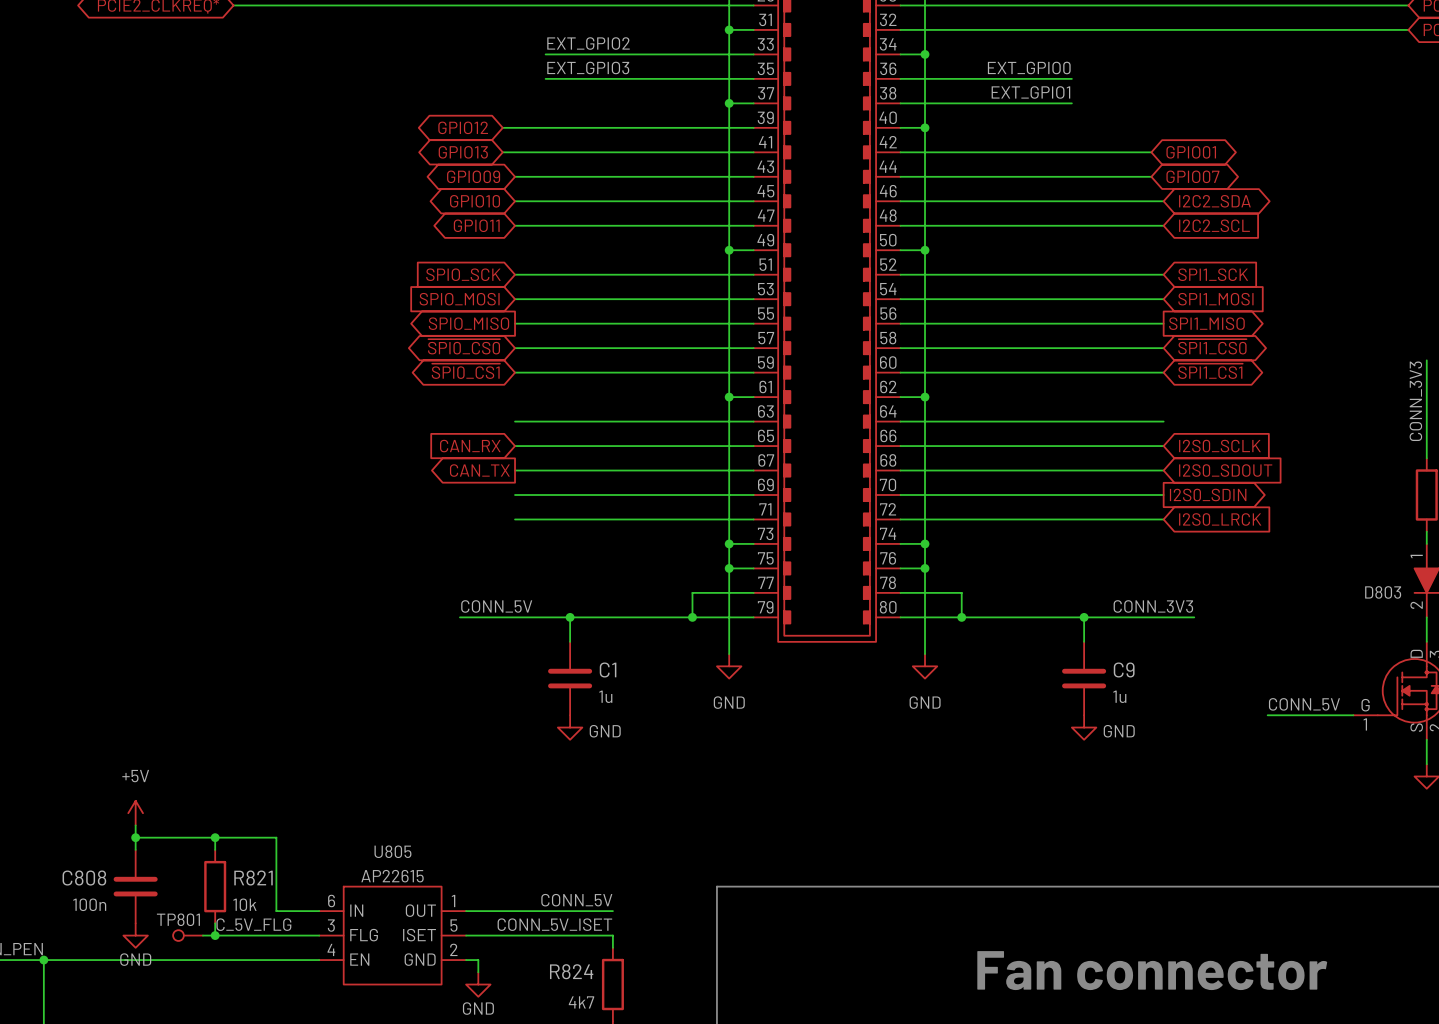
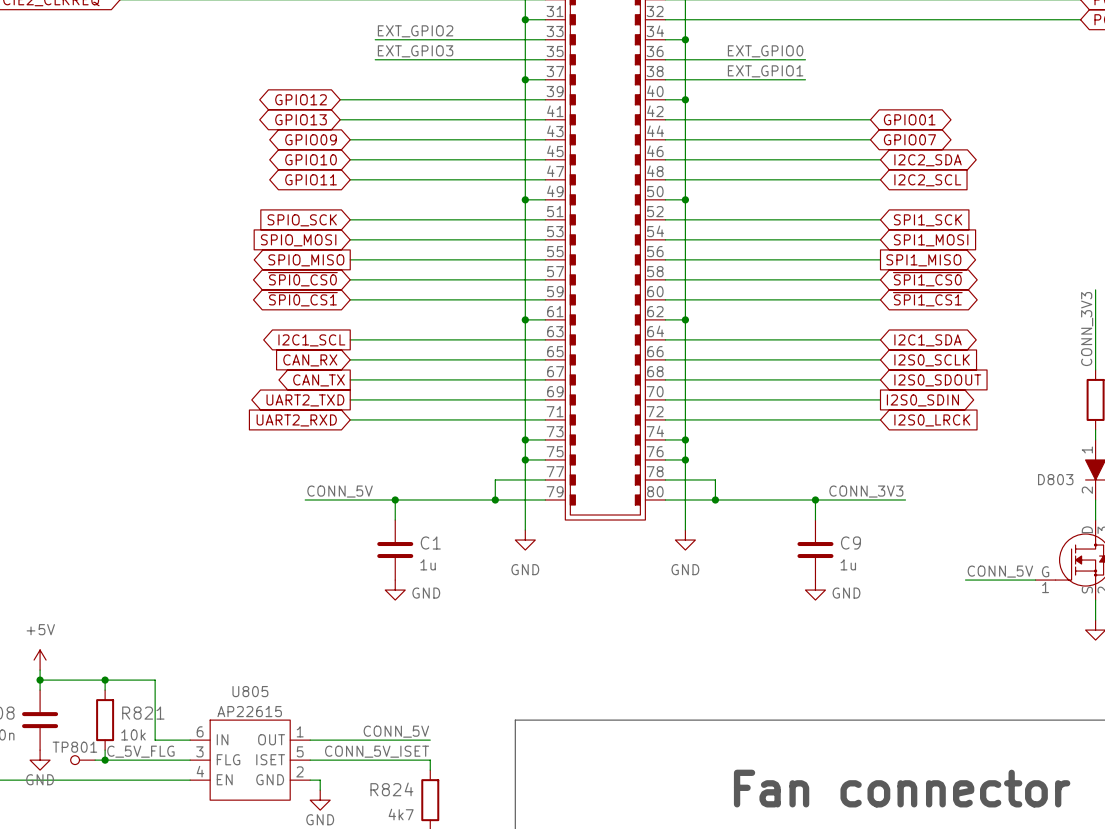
global label: none -> I2C1_SCL (311, 340)
global label: none -> I2C1_SDA (928, 340)
global label: none -> UART2_TXD (305, 400)
global label: none -> UART2_RXD (296, 420)

